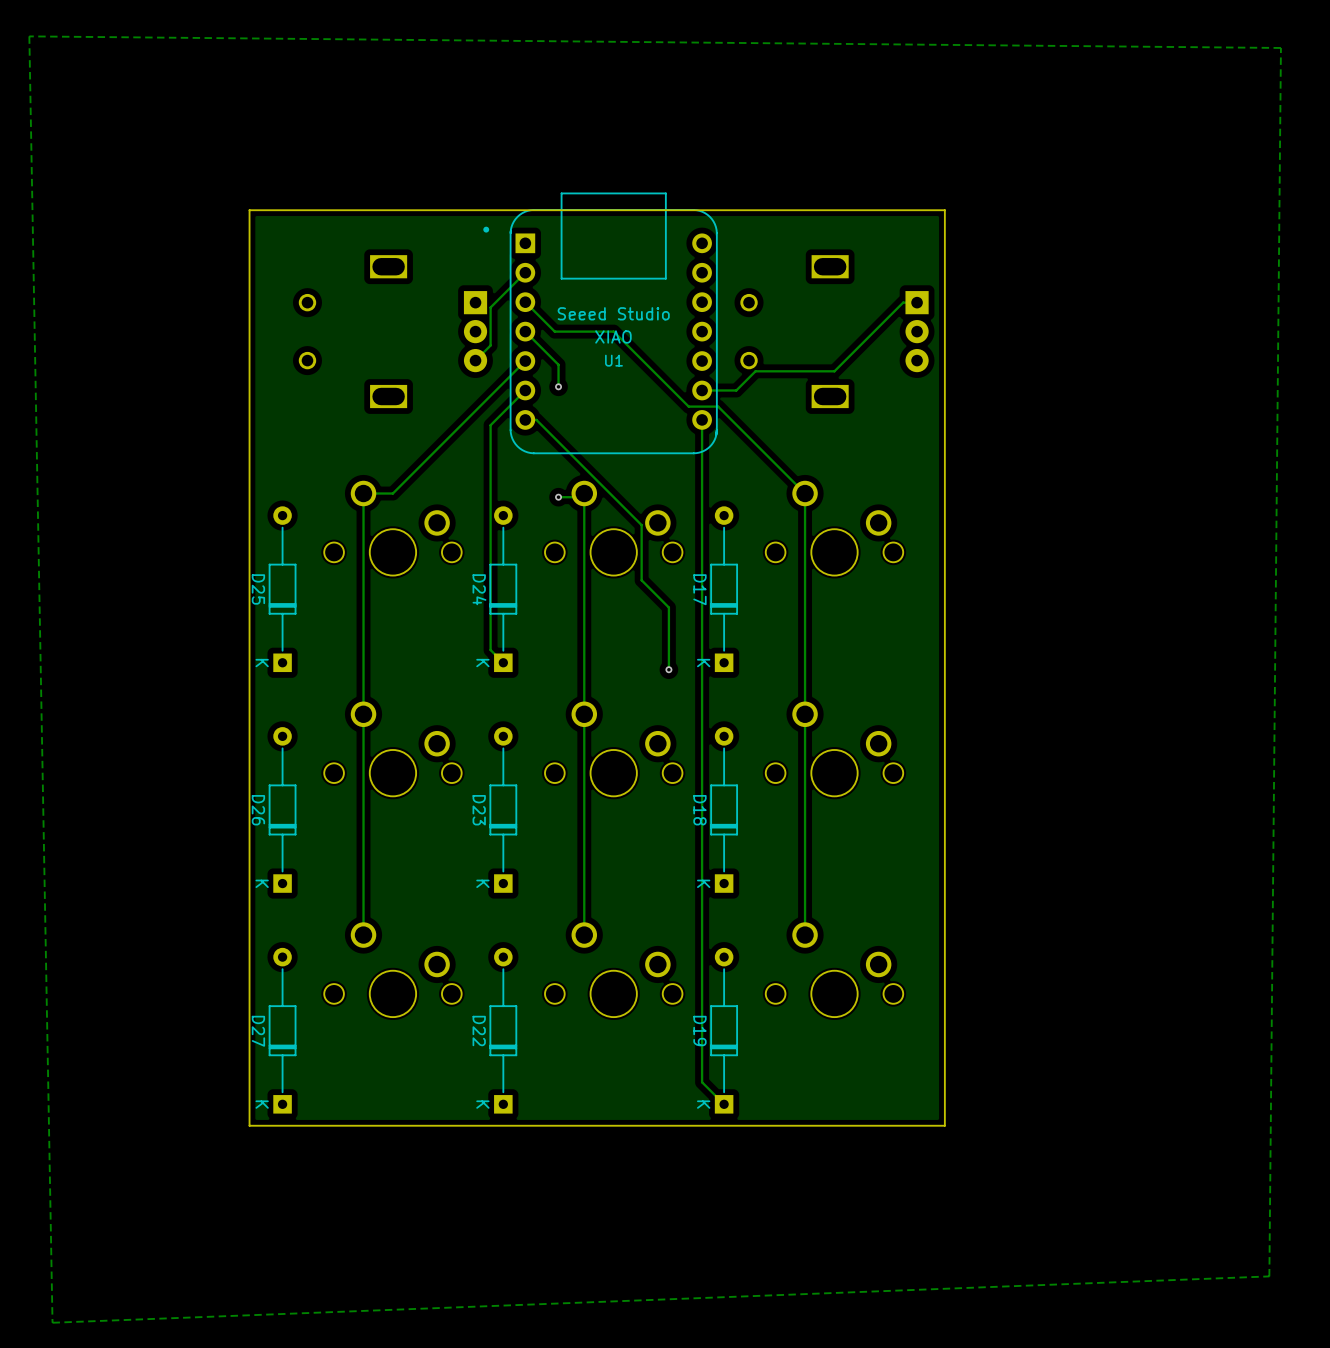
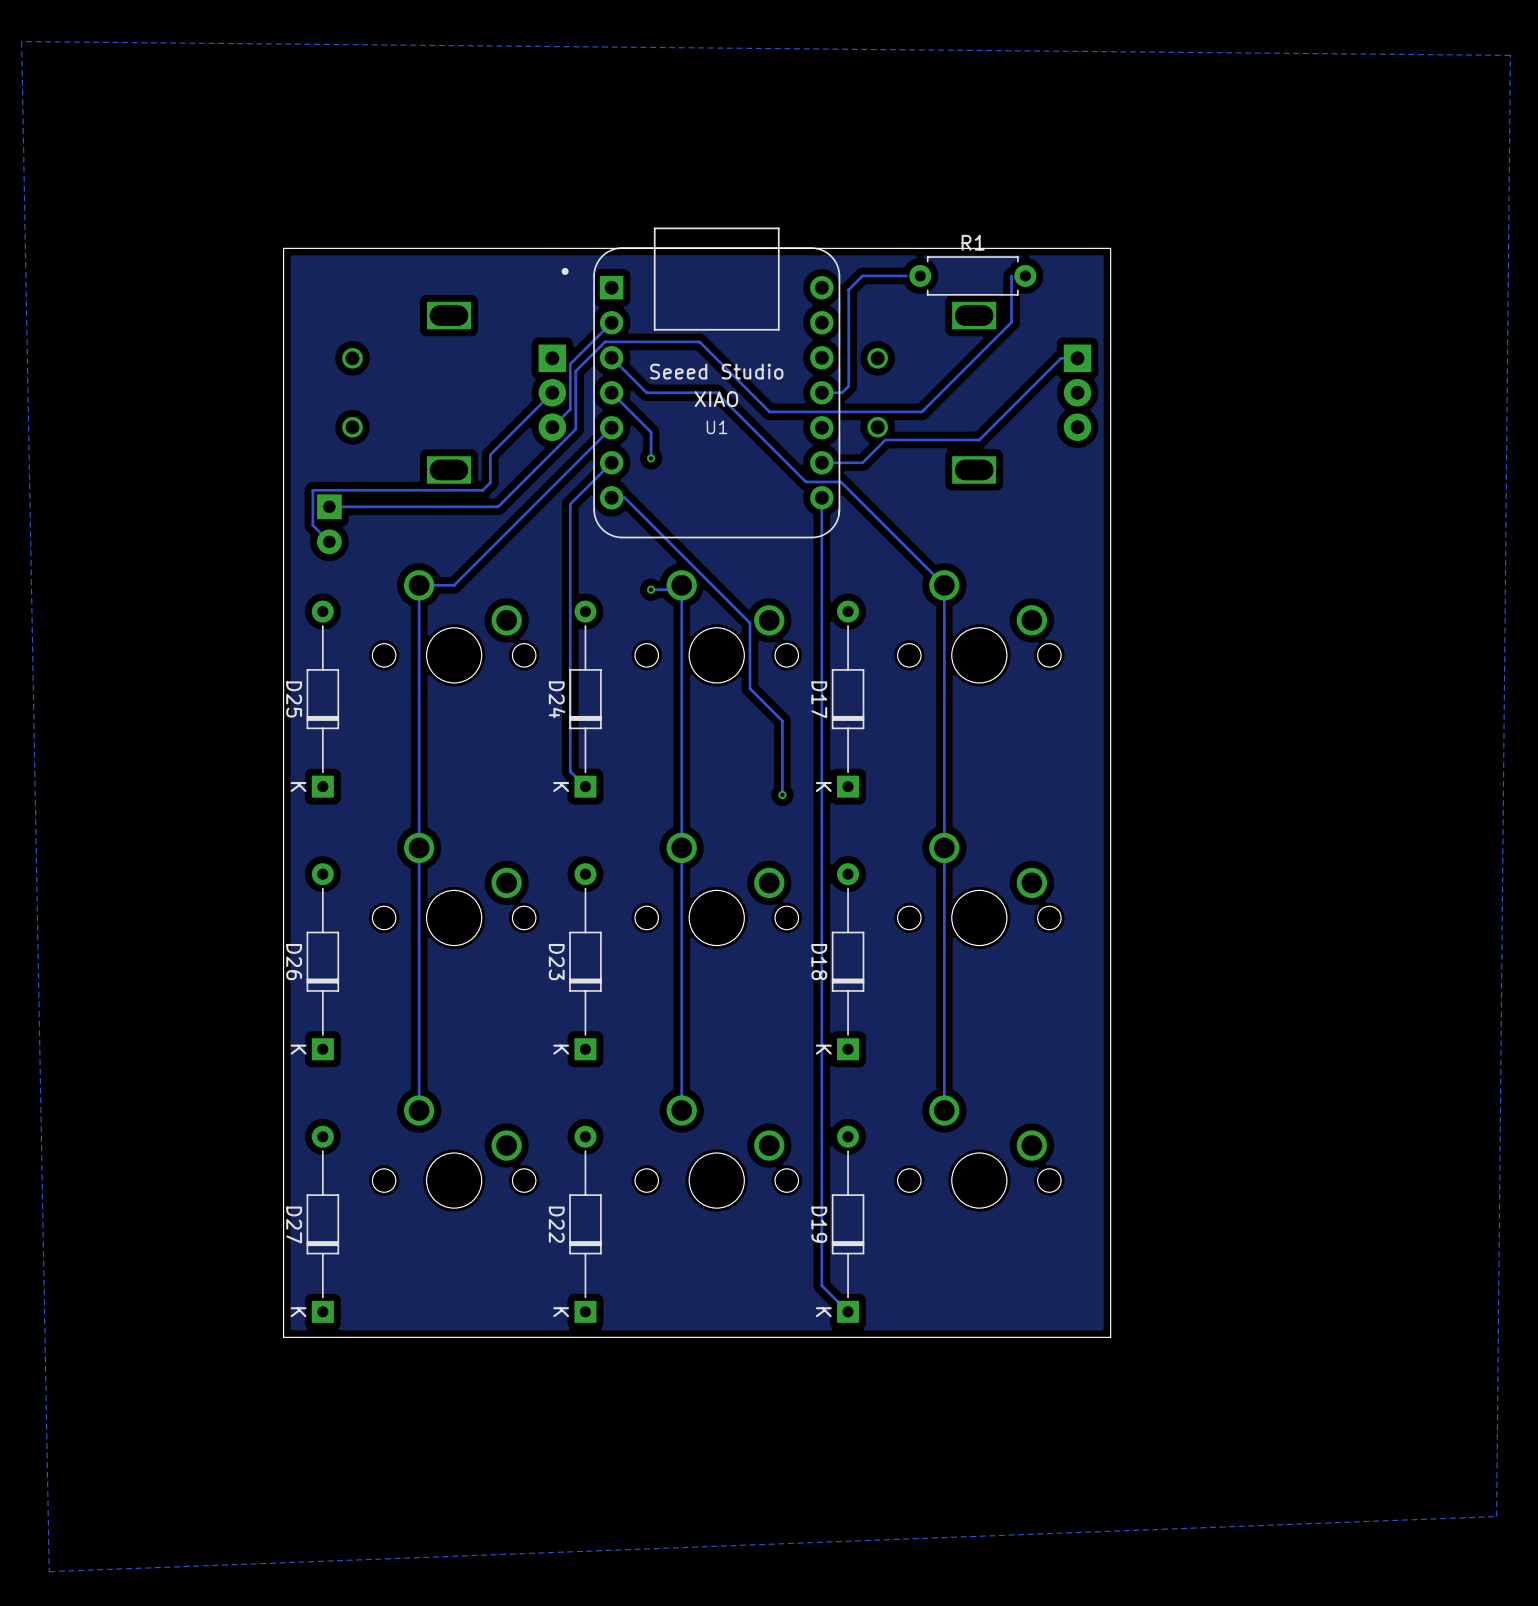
track: none -> (906, 275) (862, 275) (848, 289) (848, 386) (842, 392) (821, 392)
R1: none -> (972, 275)
track: none -> (1011, 275) (1011, 322) (921, 411) (769, 411) (699, 341) (605, 341) (575, 371) (575, 429) (498, 506) (329, 506)
track: none -> (552, 392) (490, 454) (490, 482) (482, 490) (312, 490) (312, 525) (329, 541)
part: none -> (329, 524)

